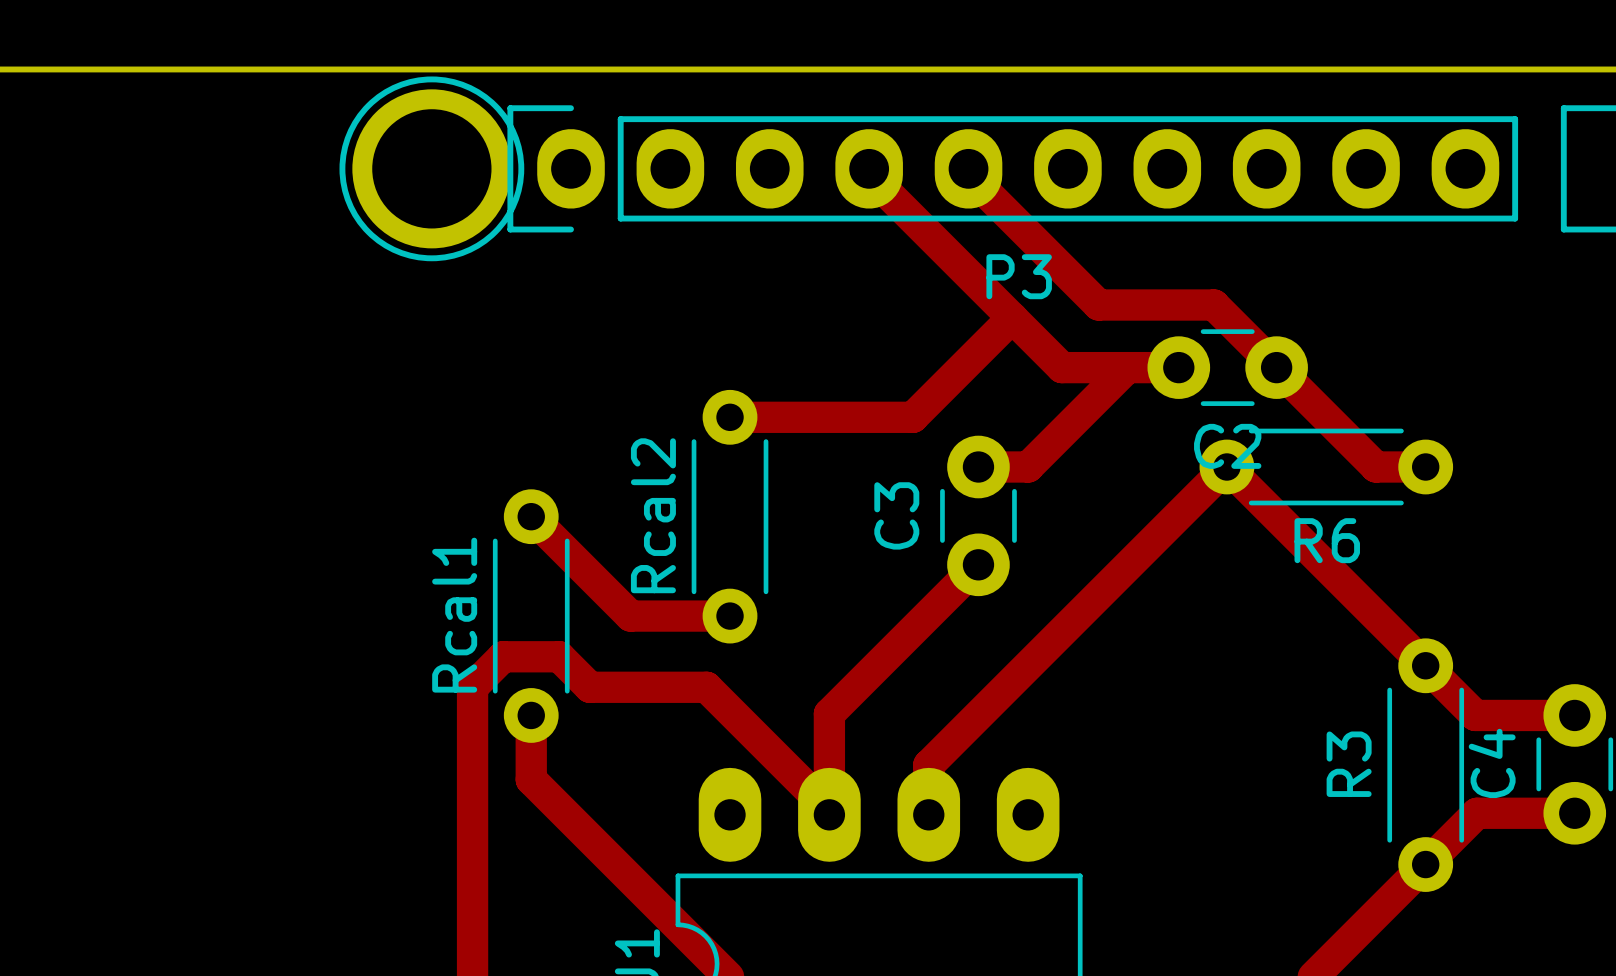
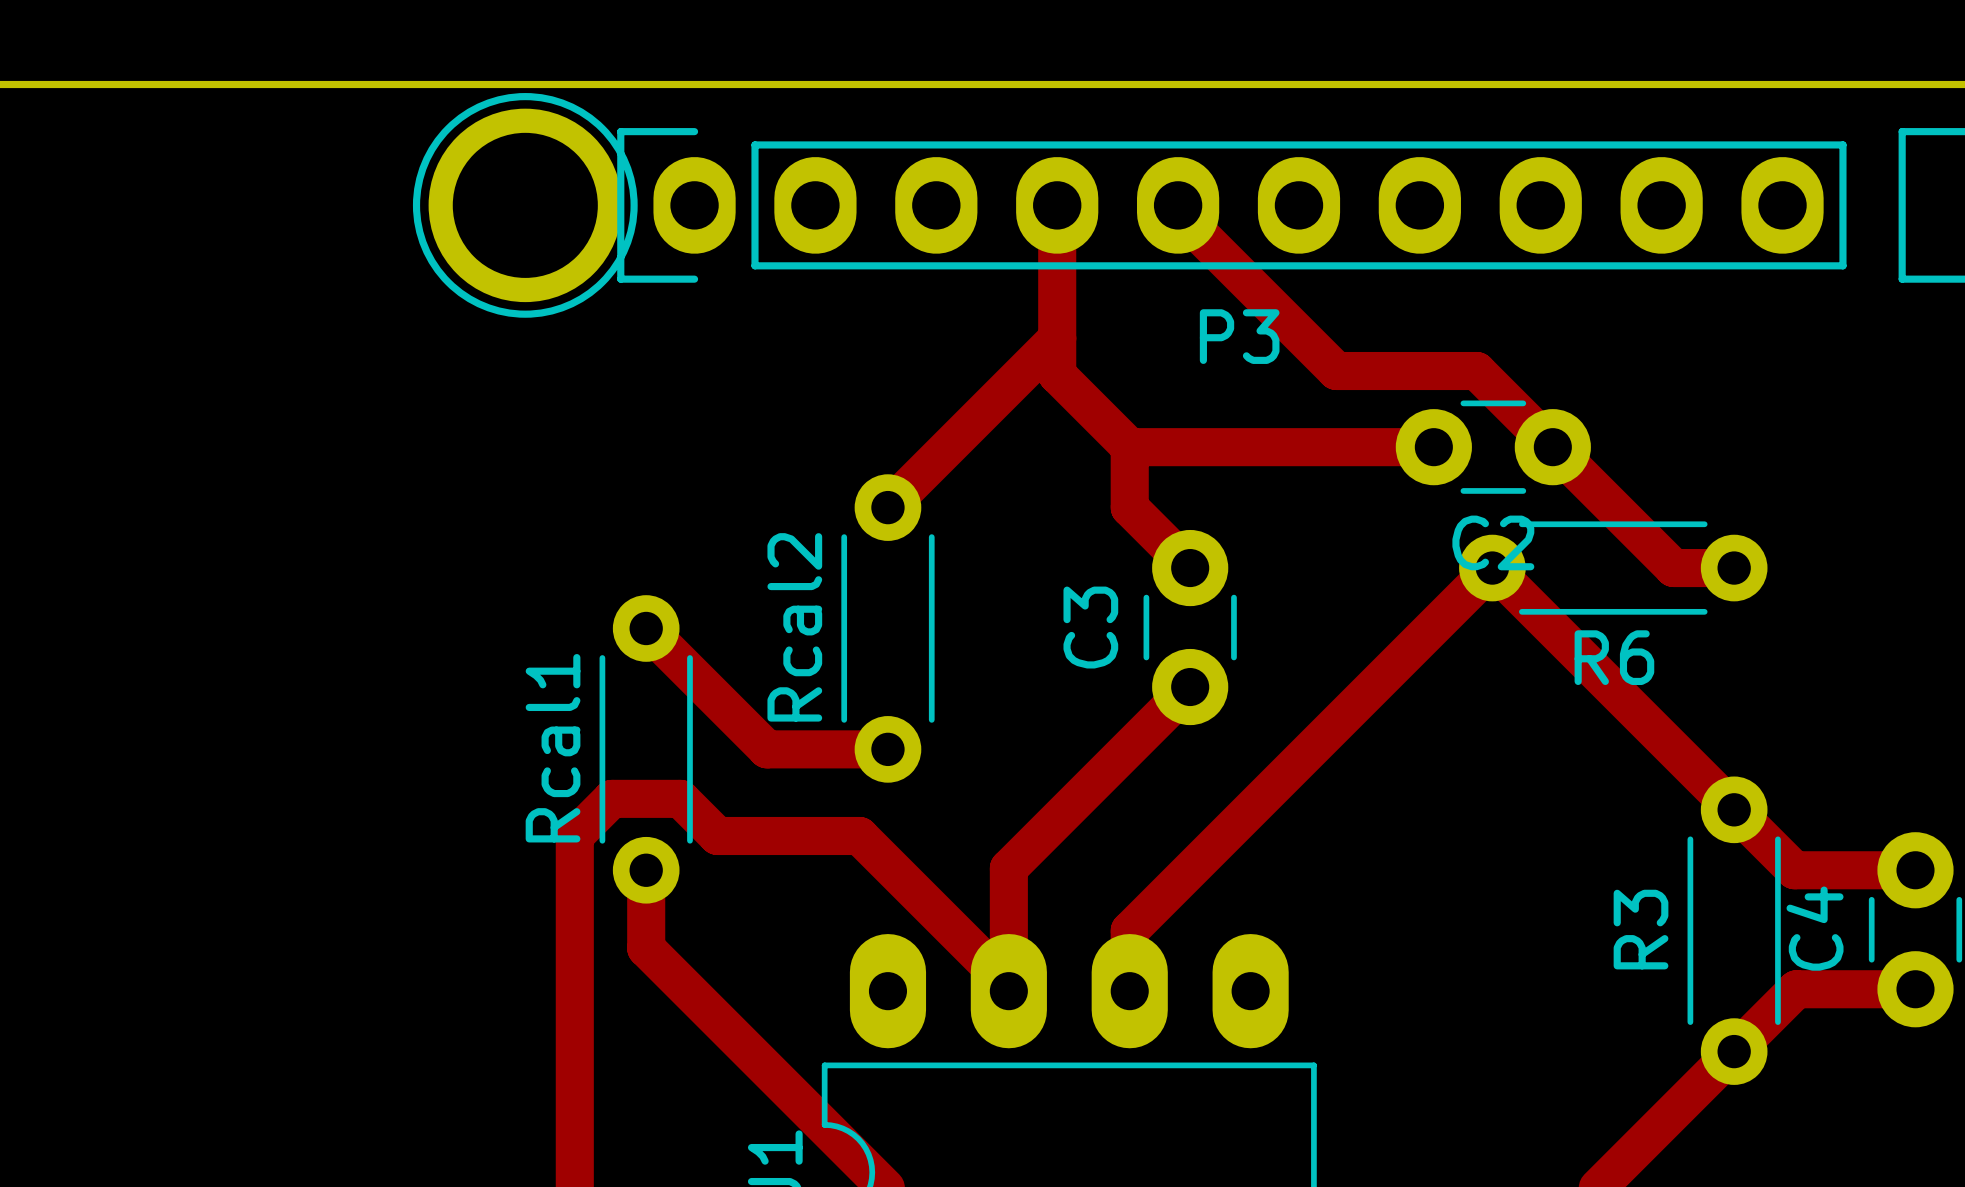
track: (869, 174) (1061, 367) -> (1057, 212) (1057, 374) (1129, 447)
track: (1012, 317) (912, 417) (730, 417) -> (1057, 338) (887, 507)
track: none -> (1129, 447) (1291, 447)
track: (1127, 367) (1028, 467) (978, 467) -> (1129, 447) (1129, 507) (1190, 568)

